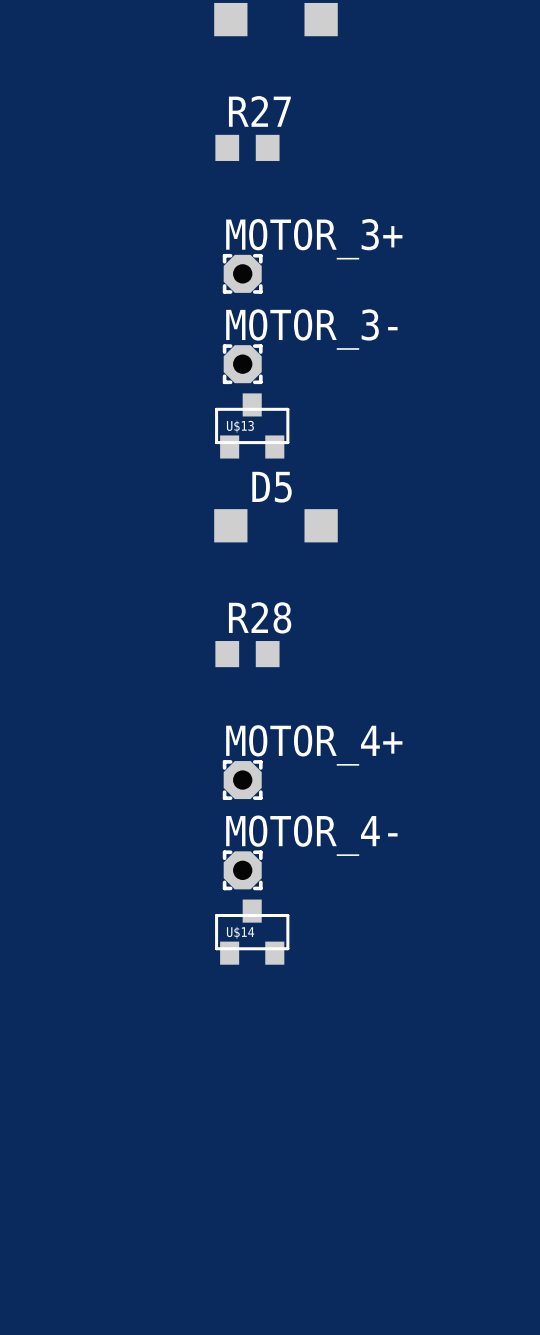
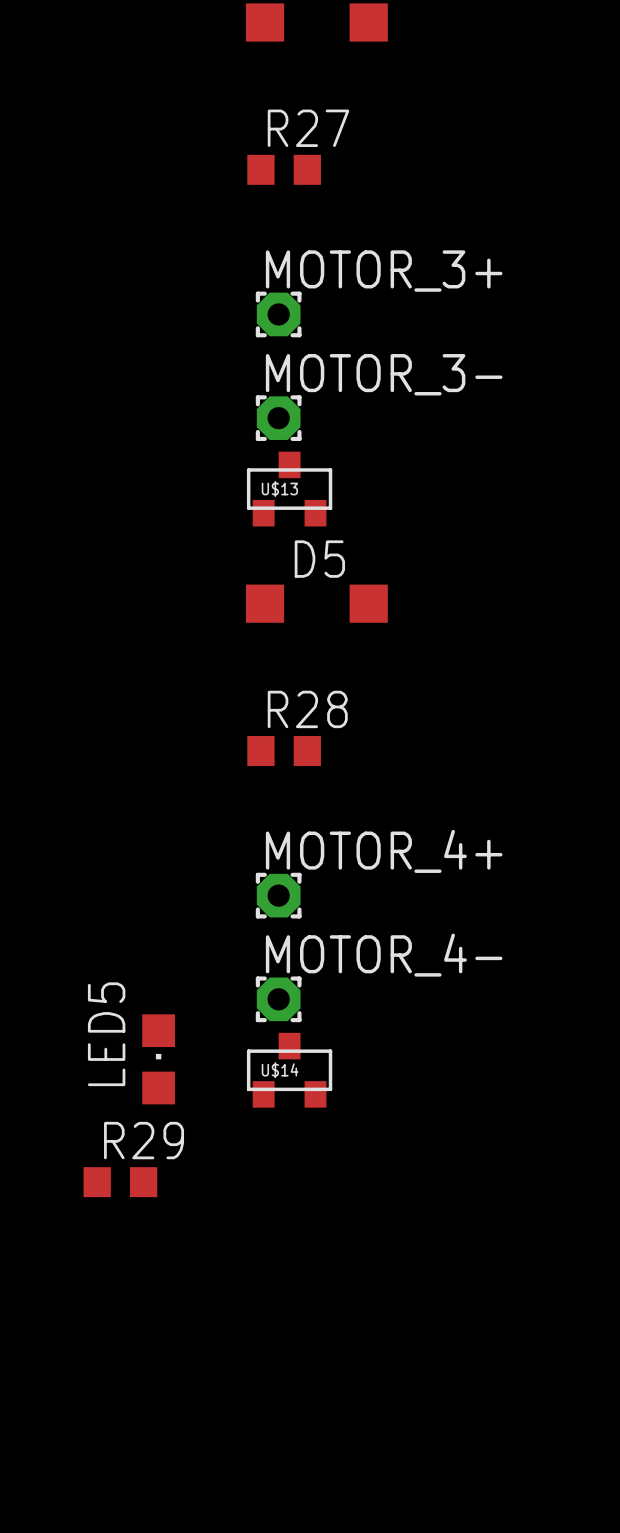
LED5: none -> (158, 1059)
R29: none -> (120, 1182)

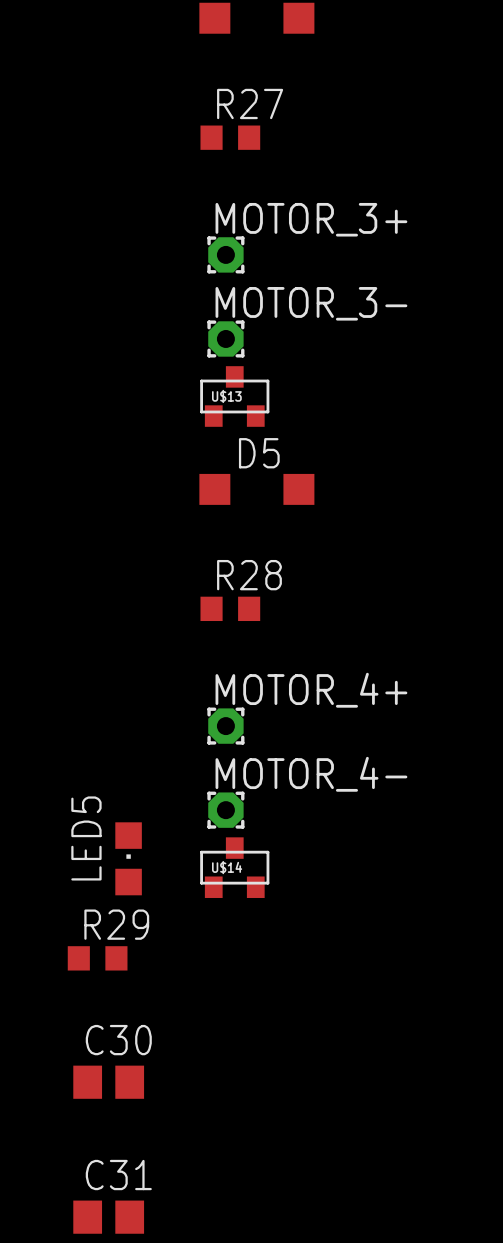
C30: none -> (108, 1082)
C31: none -> (108, 1217)

